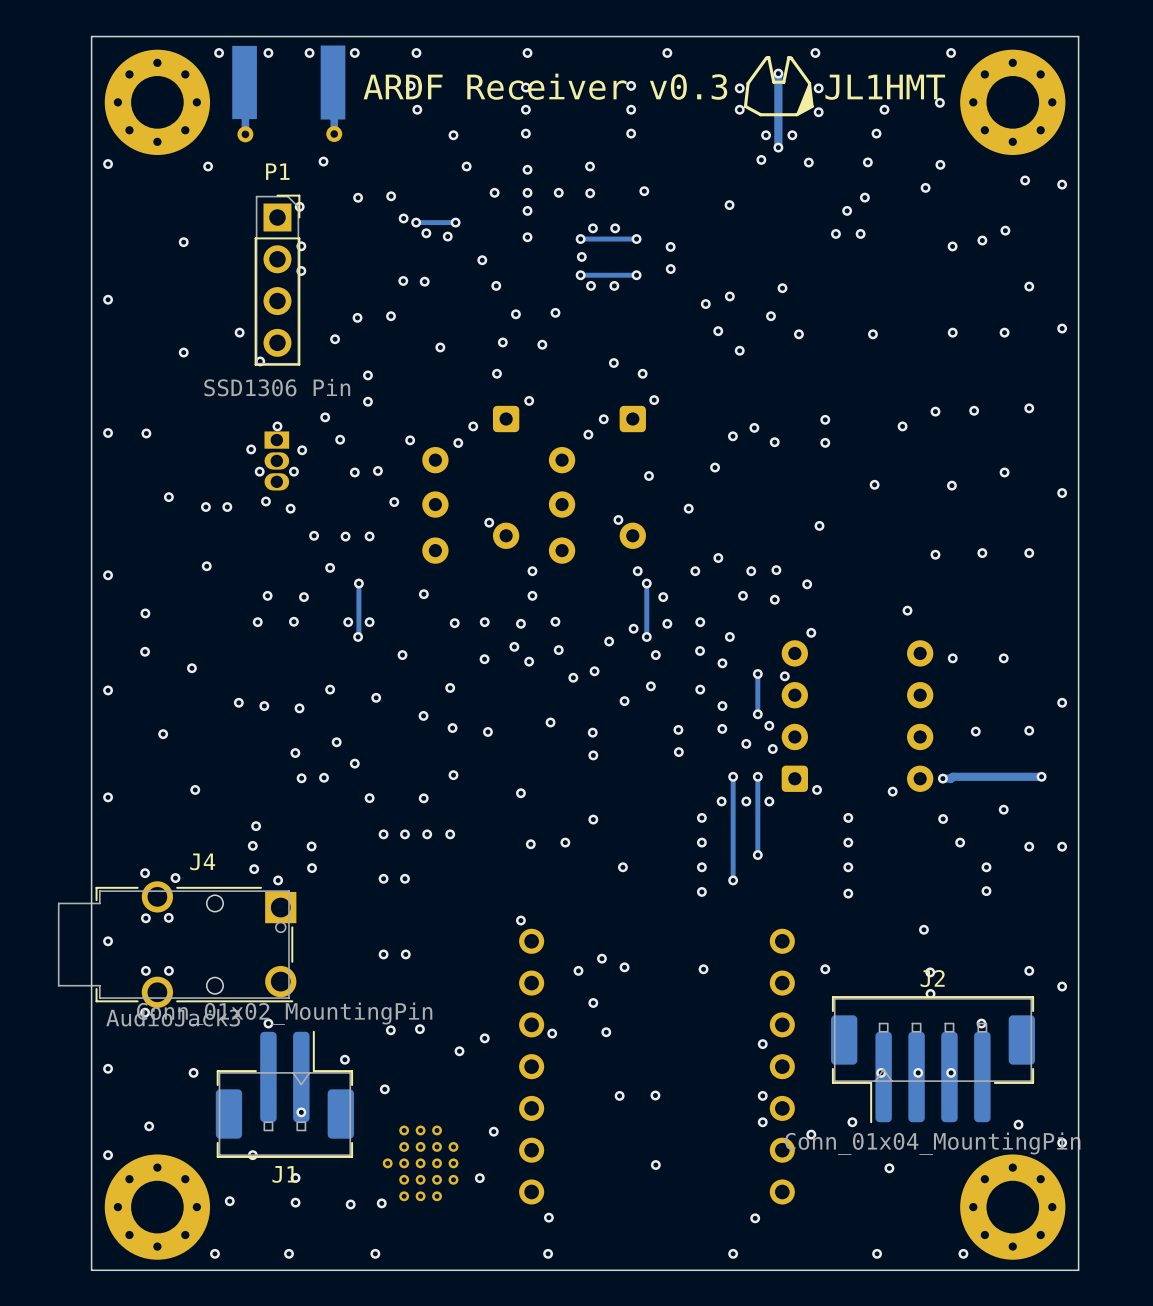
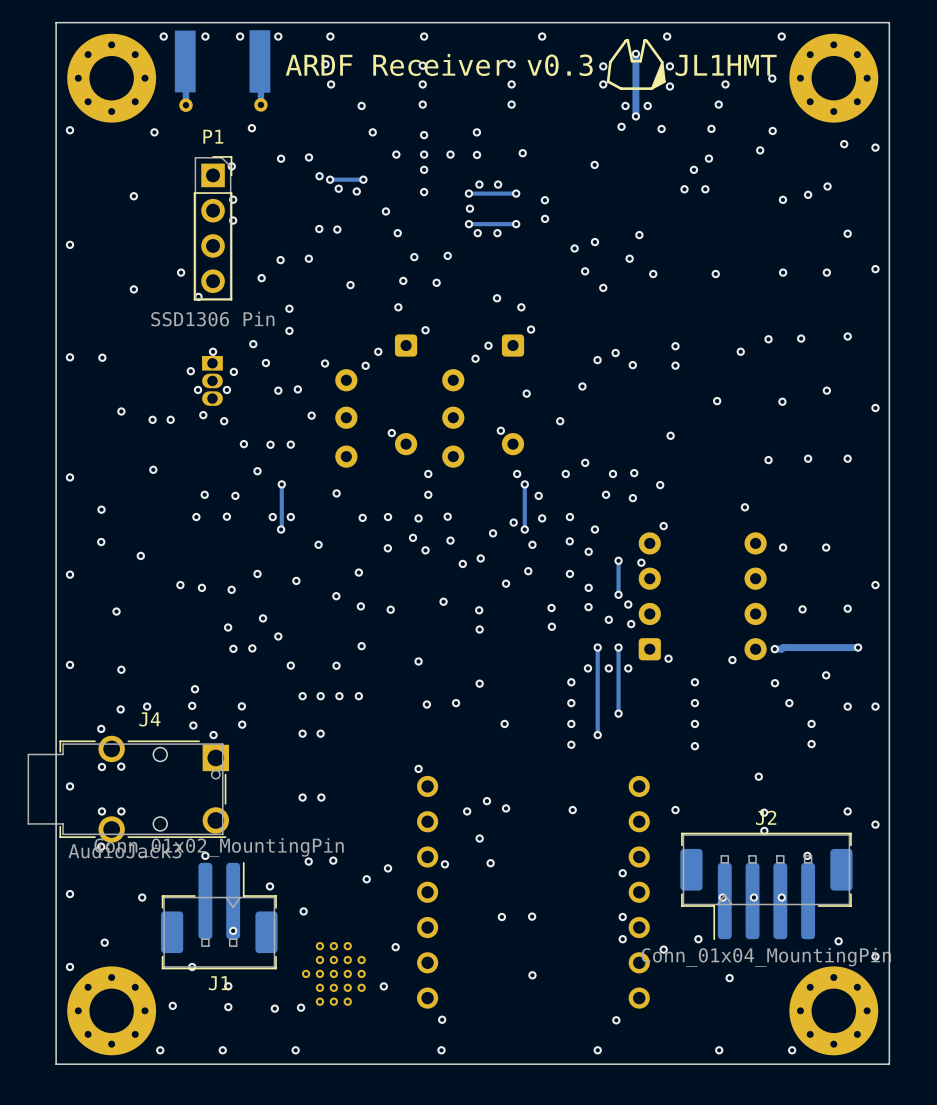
via: (195, 789) -> none
via: none -> (121, 669)
via: none -> (147, 706)
via: none -> (120, 709)
via: (175, 878) -> none

